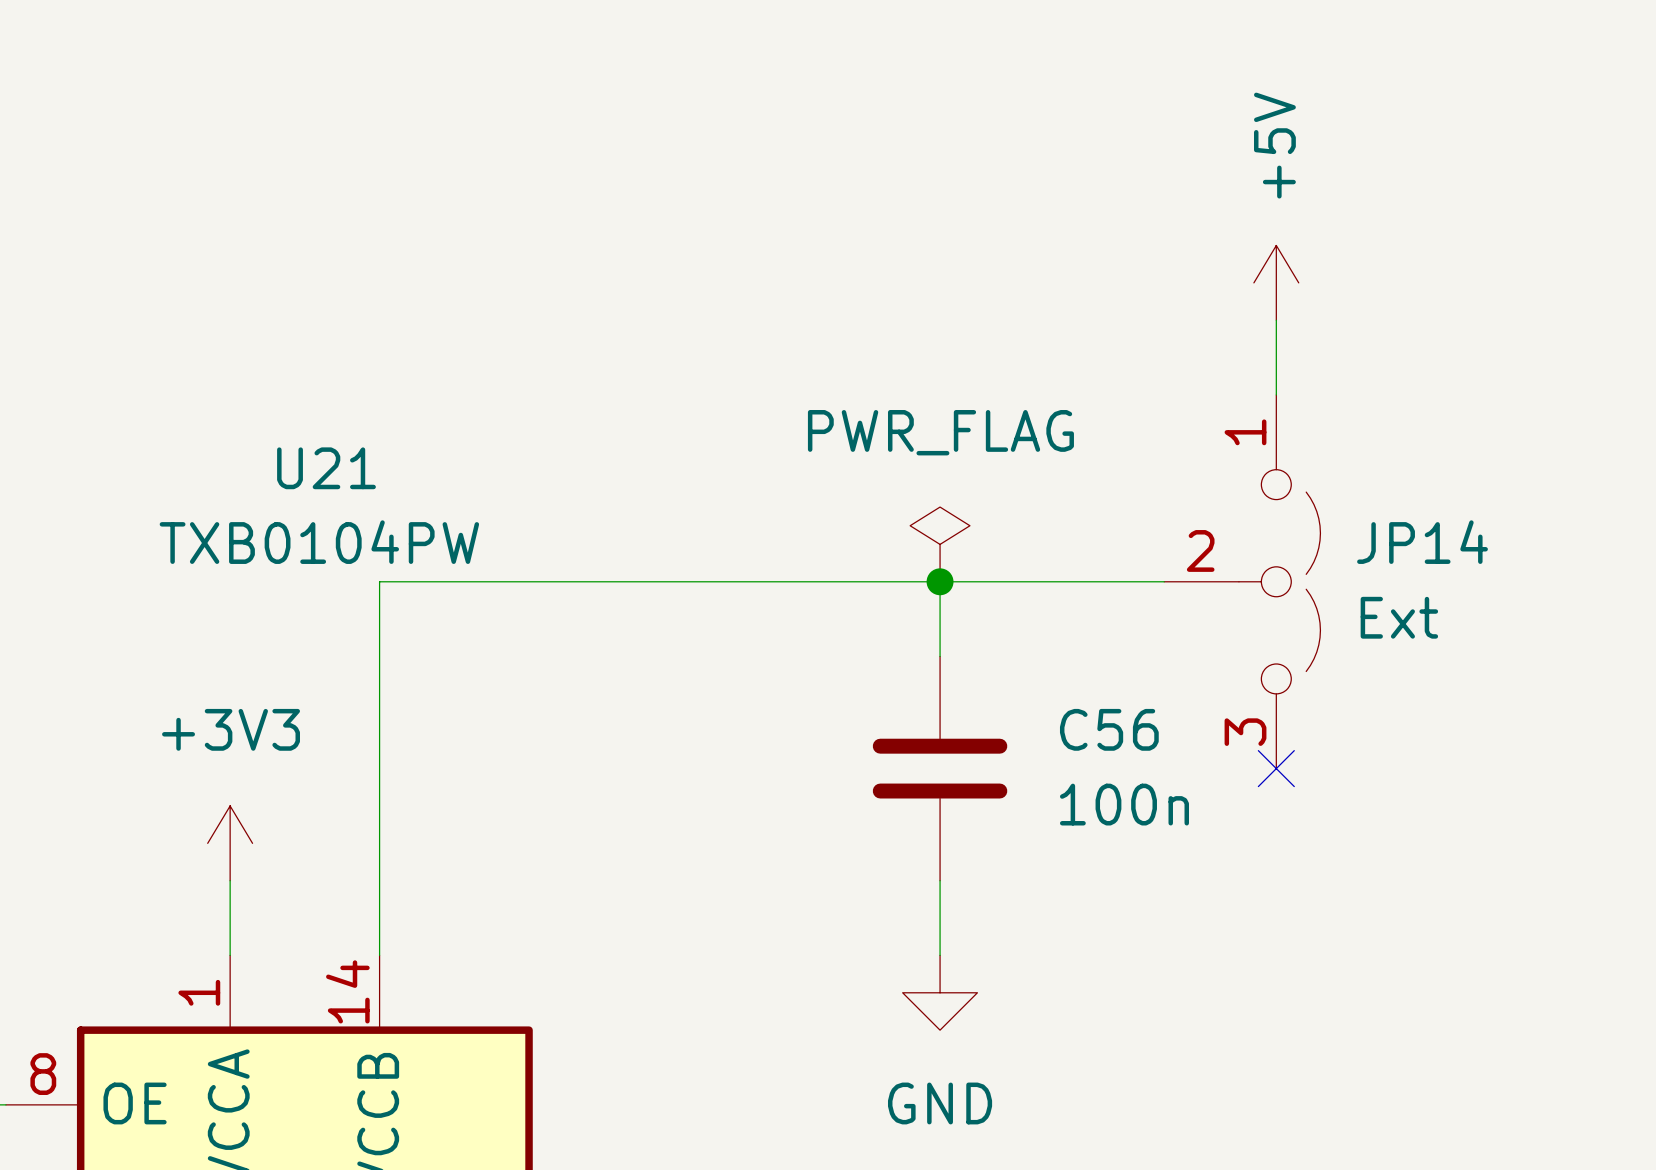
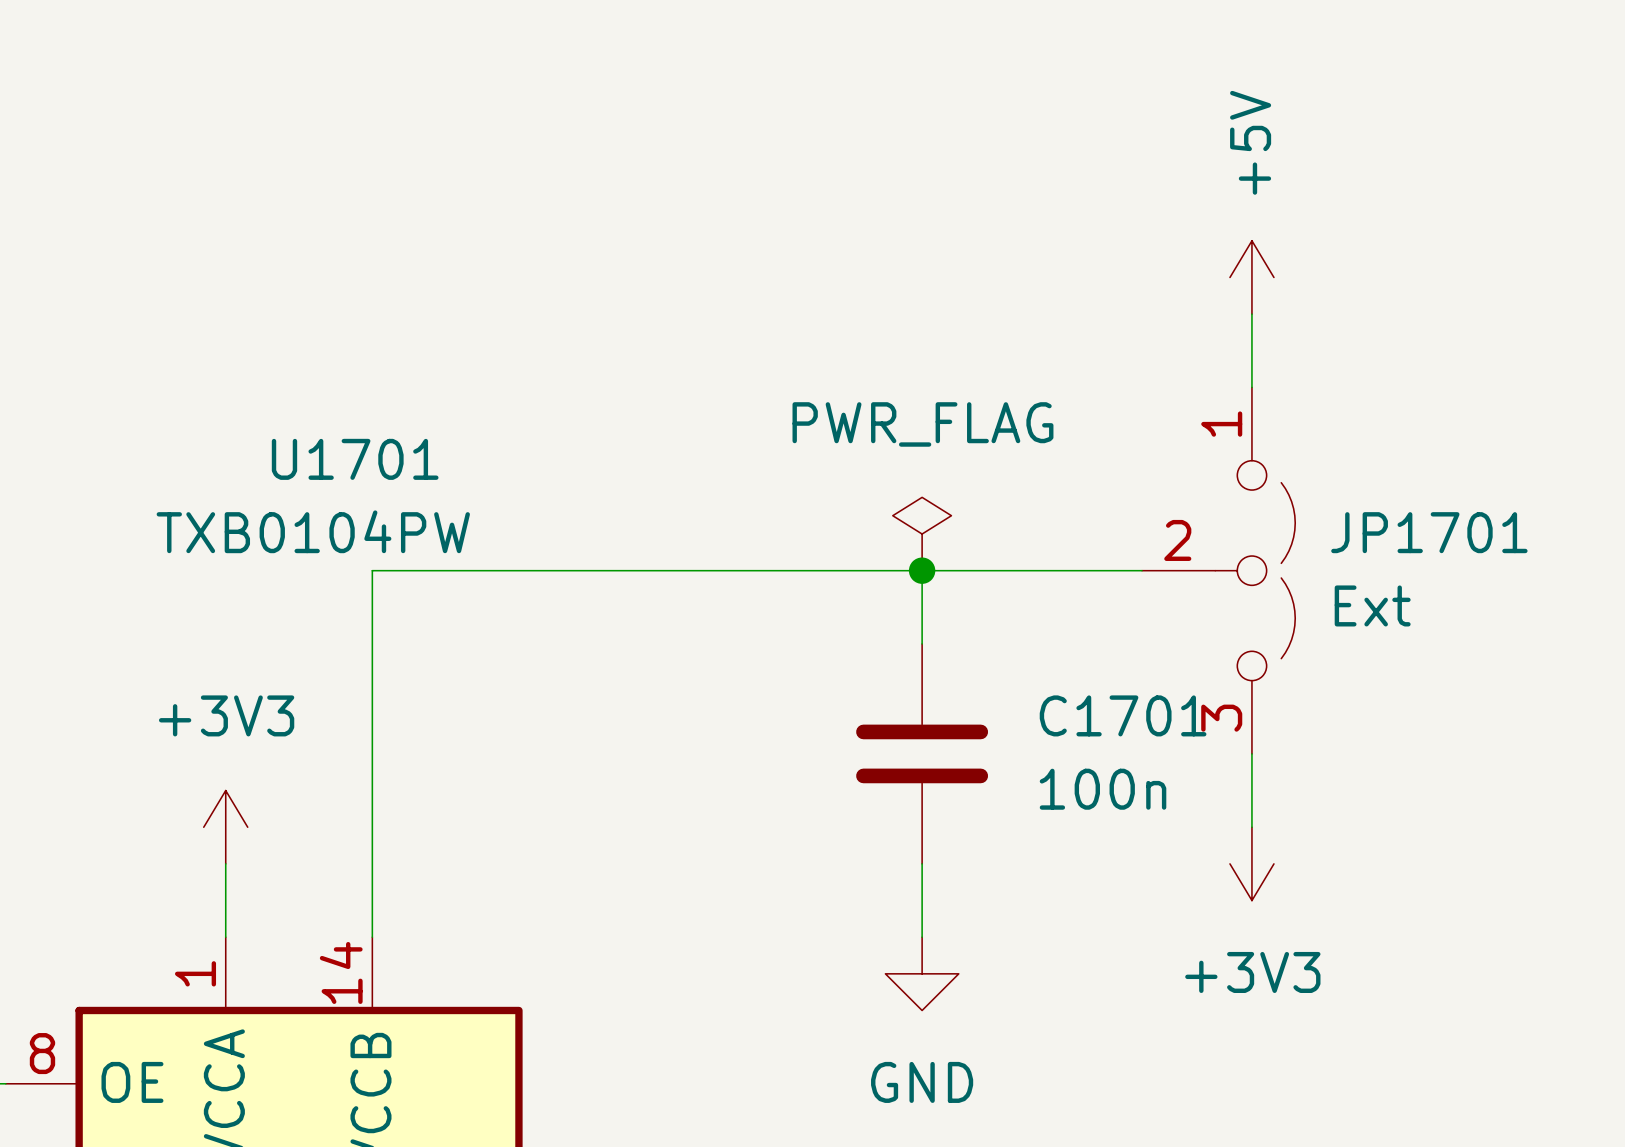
U21 name: U21 (326, 468) -> U1701 (355, 459)
JP14 name: JP14 (1422, 542) -> JP1701 (1429, 532)
C56 name: C56 (1109, 729) -> C1701 (1123, 715)
wire: none -> (1251, 753) (1251, 827)
no-connect mark: (1276, 768) -> none
power symbol: none -> +3V3 (1251, 863)

